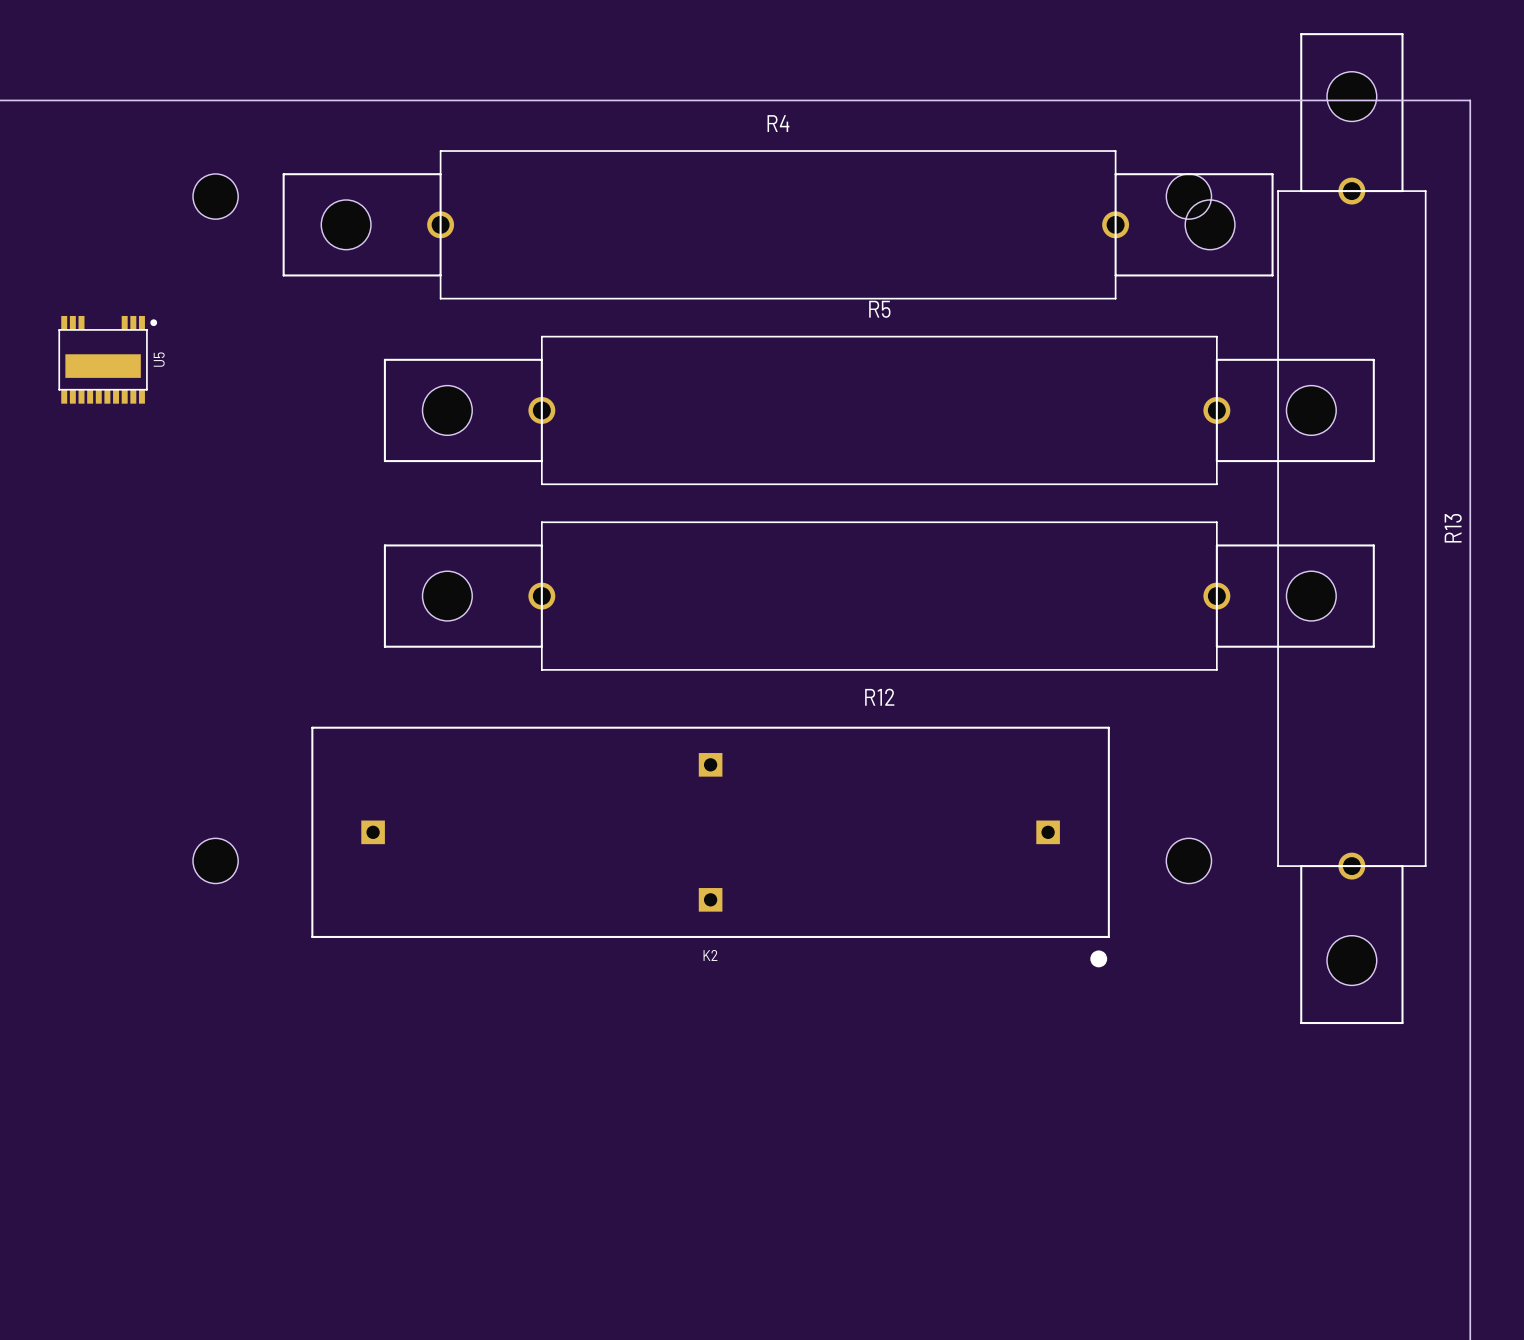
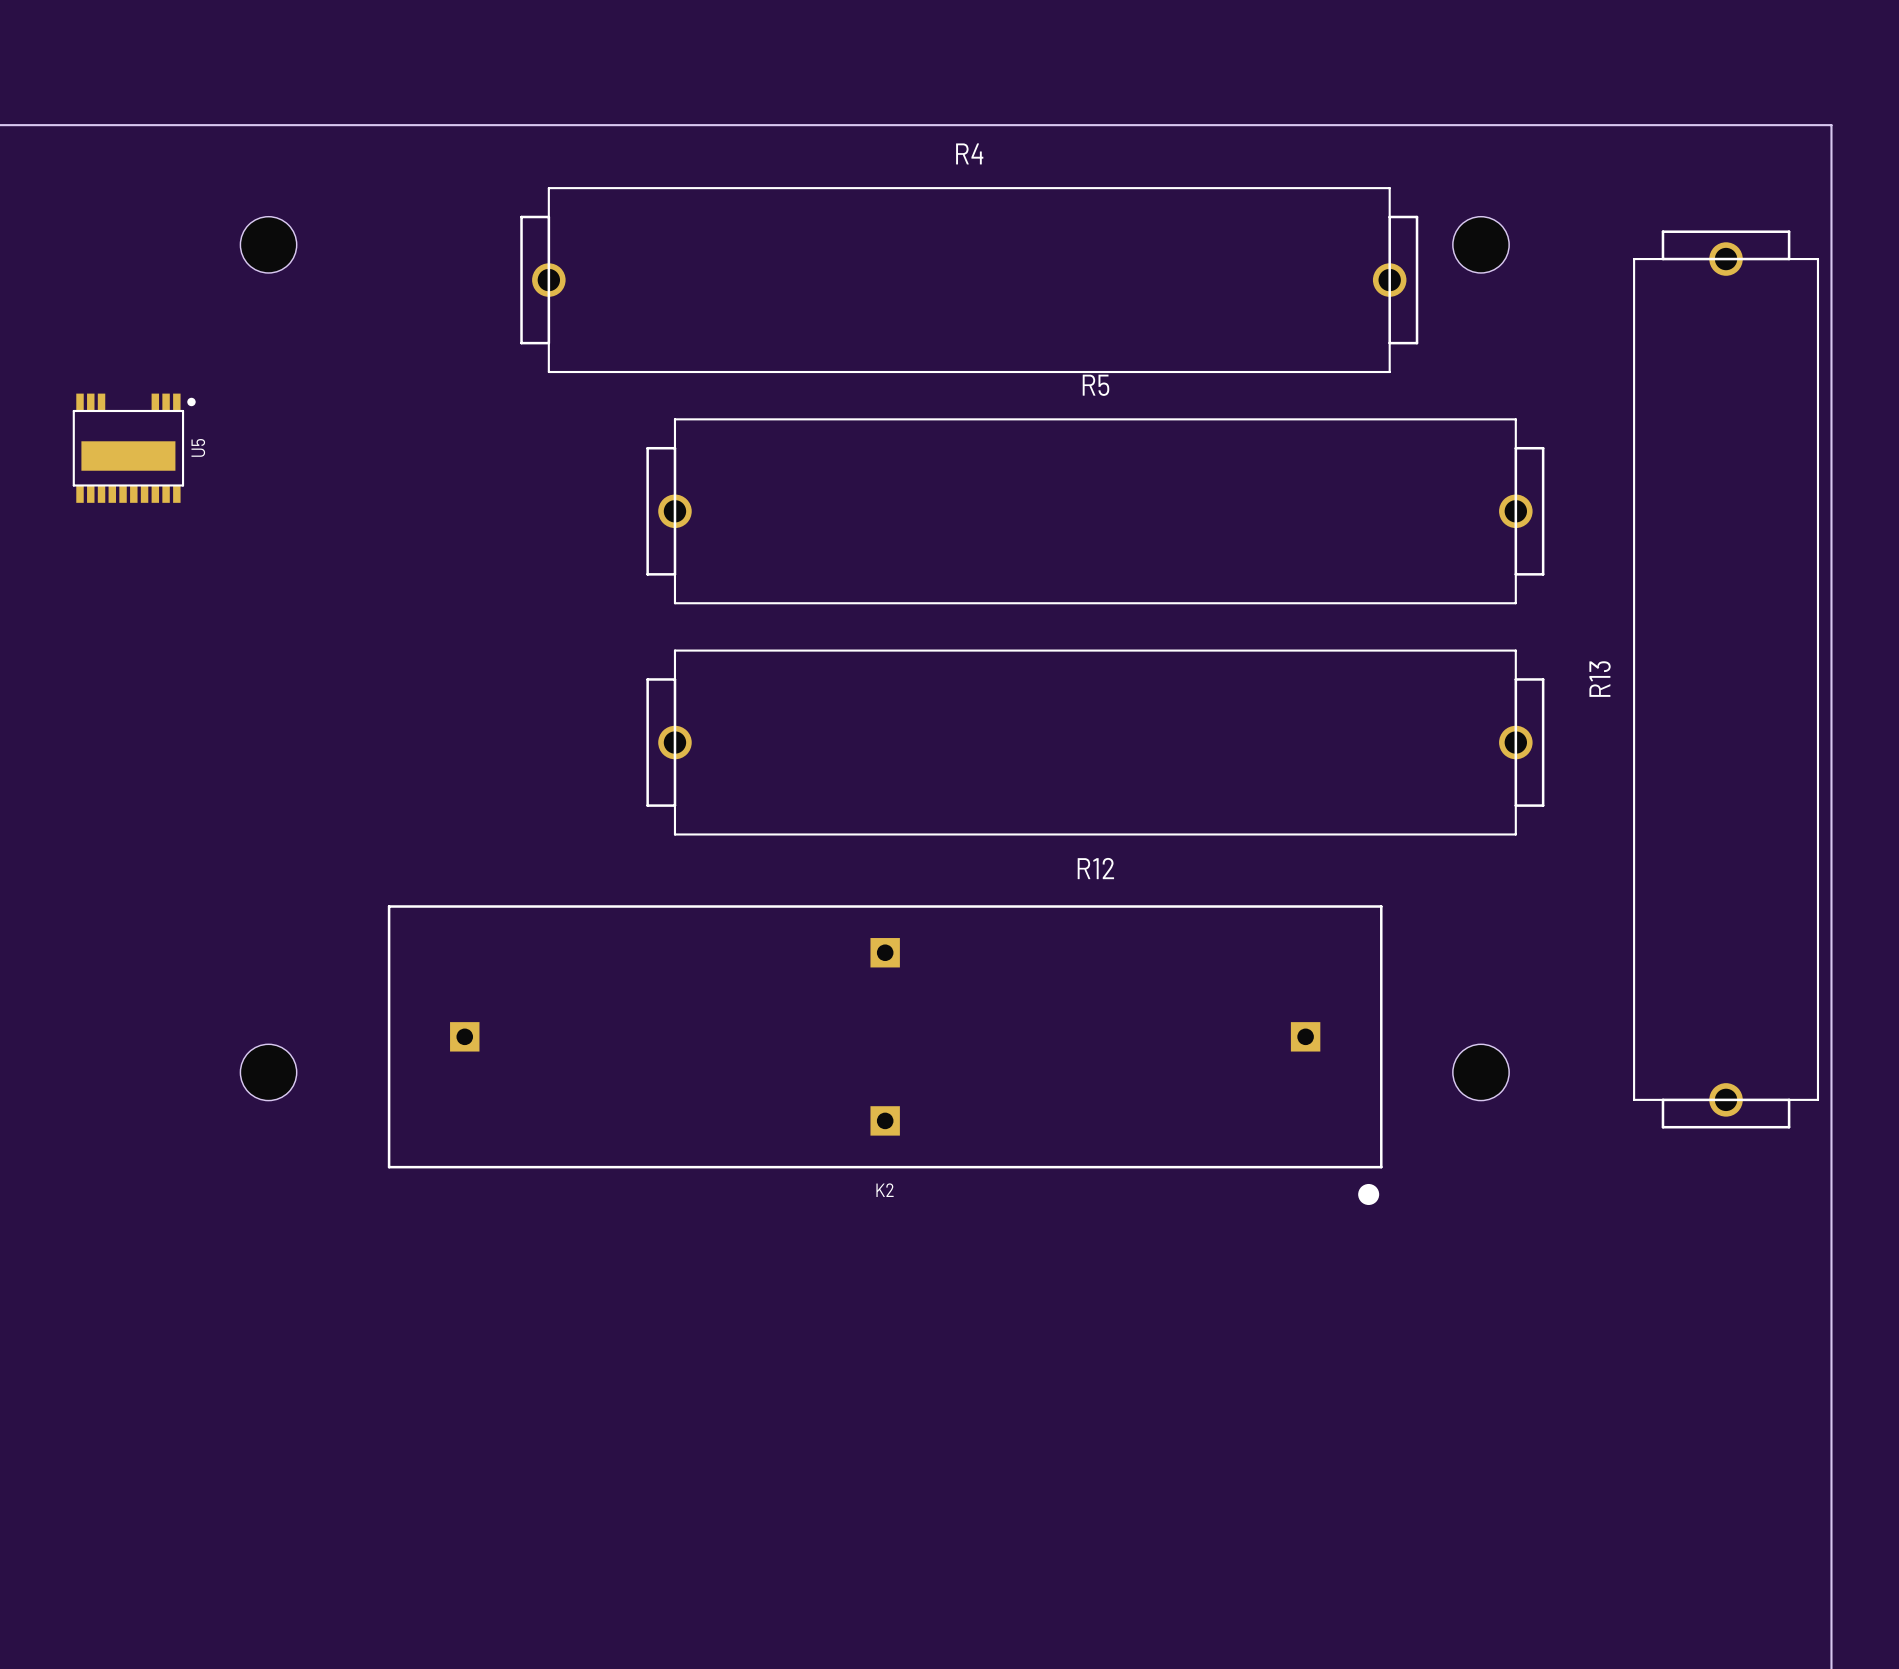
R13 footprint: [1277, 33, 1427, 1025] -> [1633, 230, 1820, 1129]
R4 footprint: [282, 150, 1274, 300] -> [520, 187, 1419, 374]
R5 footprint: [383, 335, 1375, 486] -> [646, 418, 1545, 605]
R12 footprint: [383, 521, 1375, 671] -> [646, 649, 1545, 836]
R13 name position: R13 (1453, 528) -> R13 (1600, 679)

